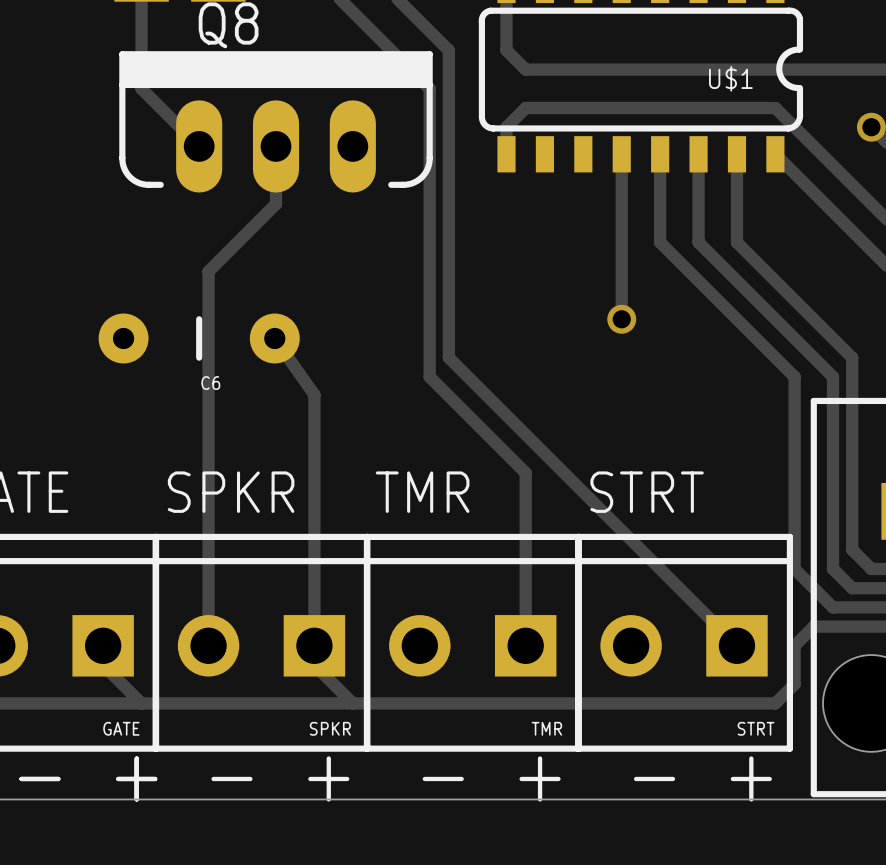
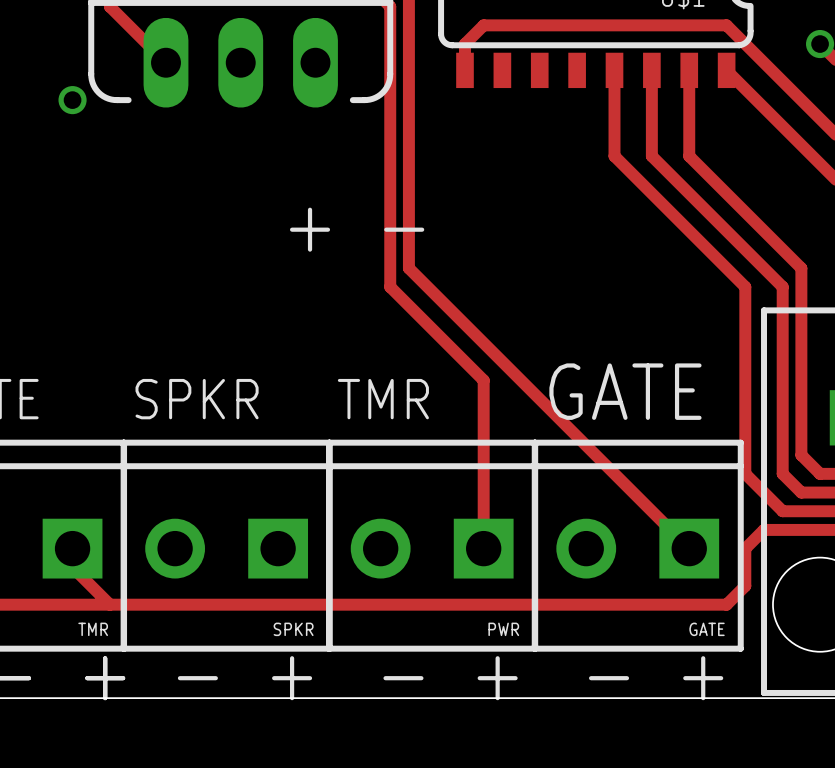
track: (276, 146) (276, 204) (208, 271) (208, 645) -> none
track: (621, 154) (621, 319) -> none
via: none -> (72, 100)
text: none -> + - (357, 229)
via: (621, 319) -> none
C6: (199, 338) -> none
track: (274, 338) (314, 394) (314, 665) (352, 703) -> none
text: STRT (647, 492) -> GATE (625, 391)
GATE name: GATE (121, 728) -> TMR (93, 629)
TMR name: TMR (546, 728) -> PWR (503, 629)
STRT name: STRT (756, 728) -> GATE (707, 629)

